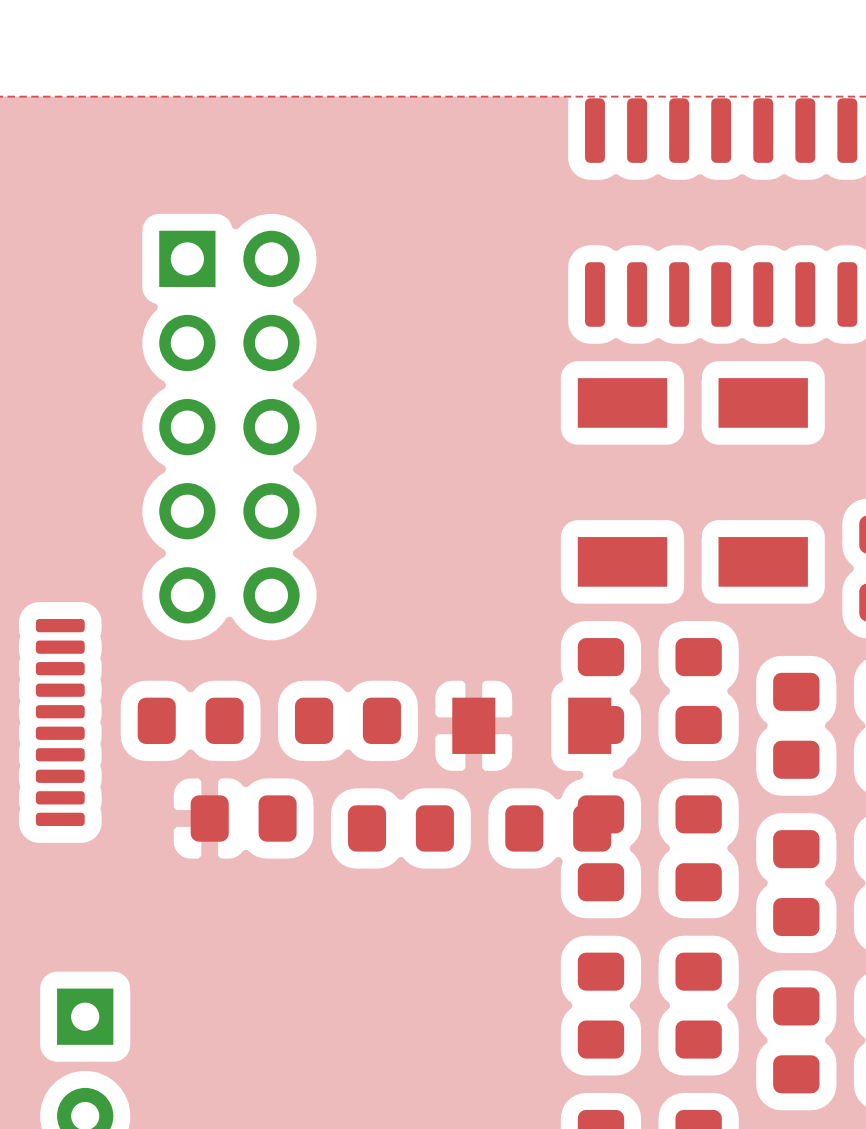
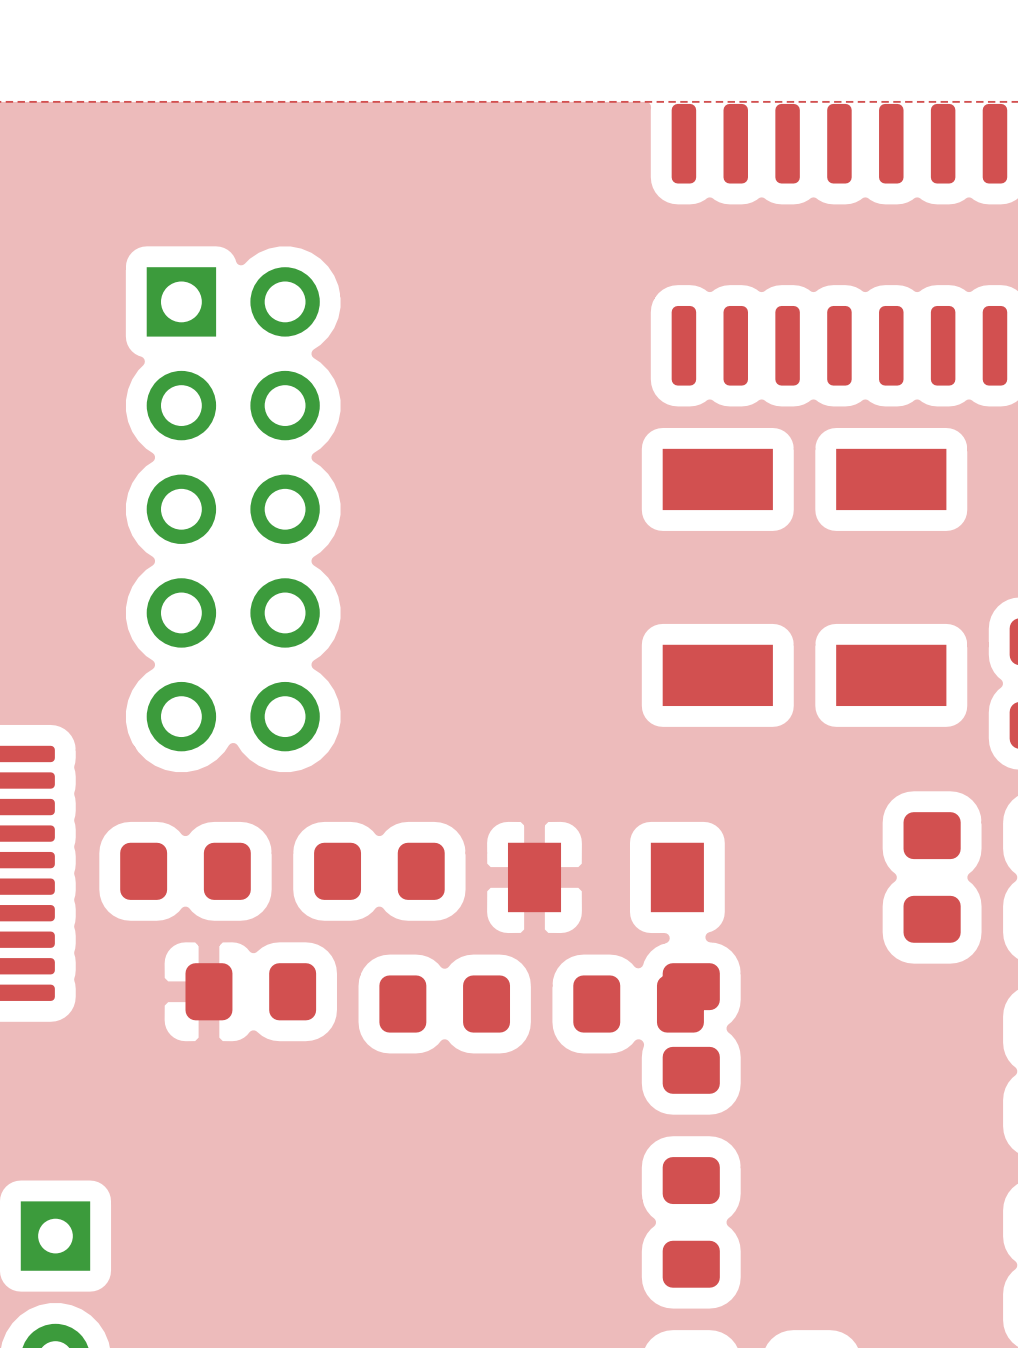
part: (600, 691) -> none
part: (698, 691) -> none
part: (698, 848) -> none
part: (796, 883) -> none
part: (698, 1005) -> none
part: (796, 1040) -> none

